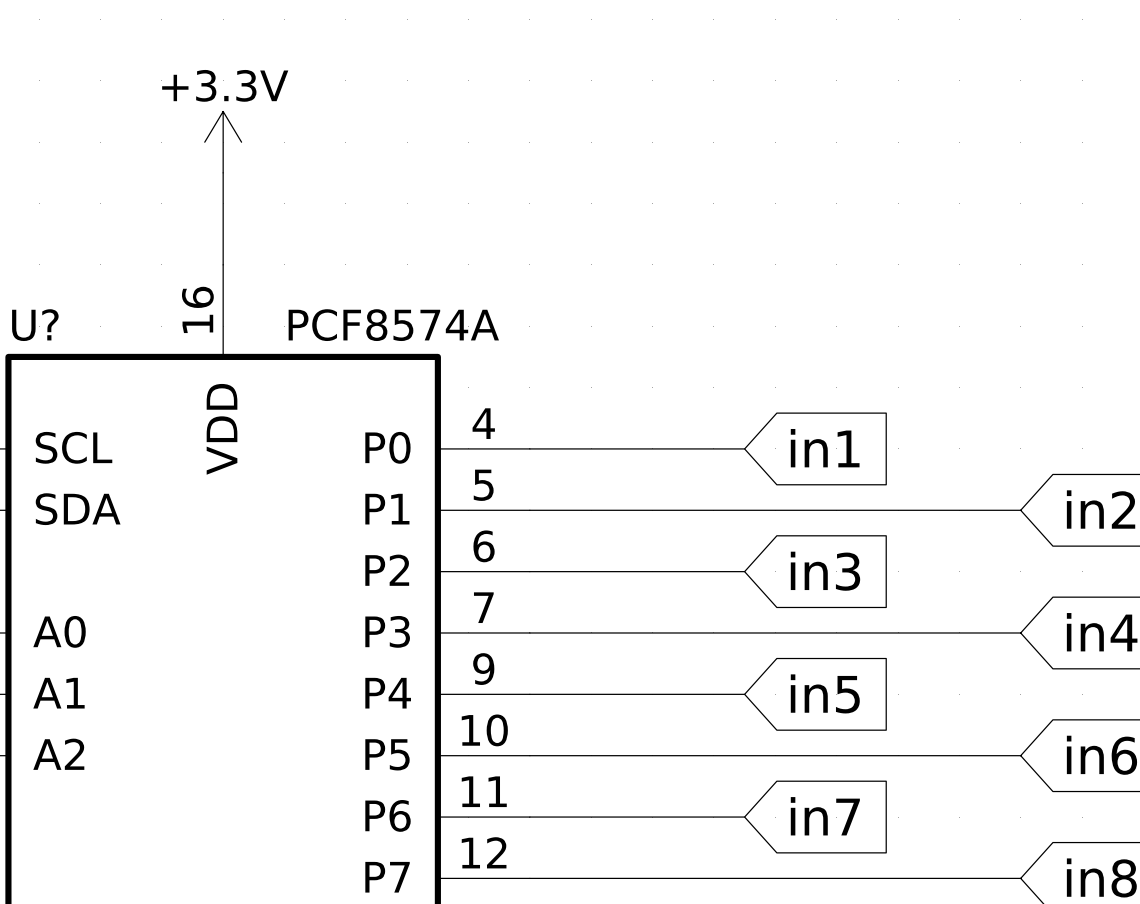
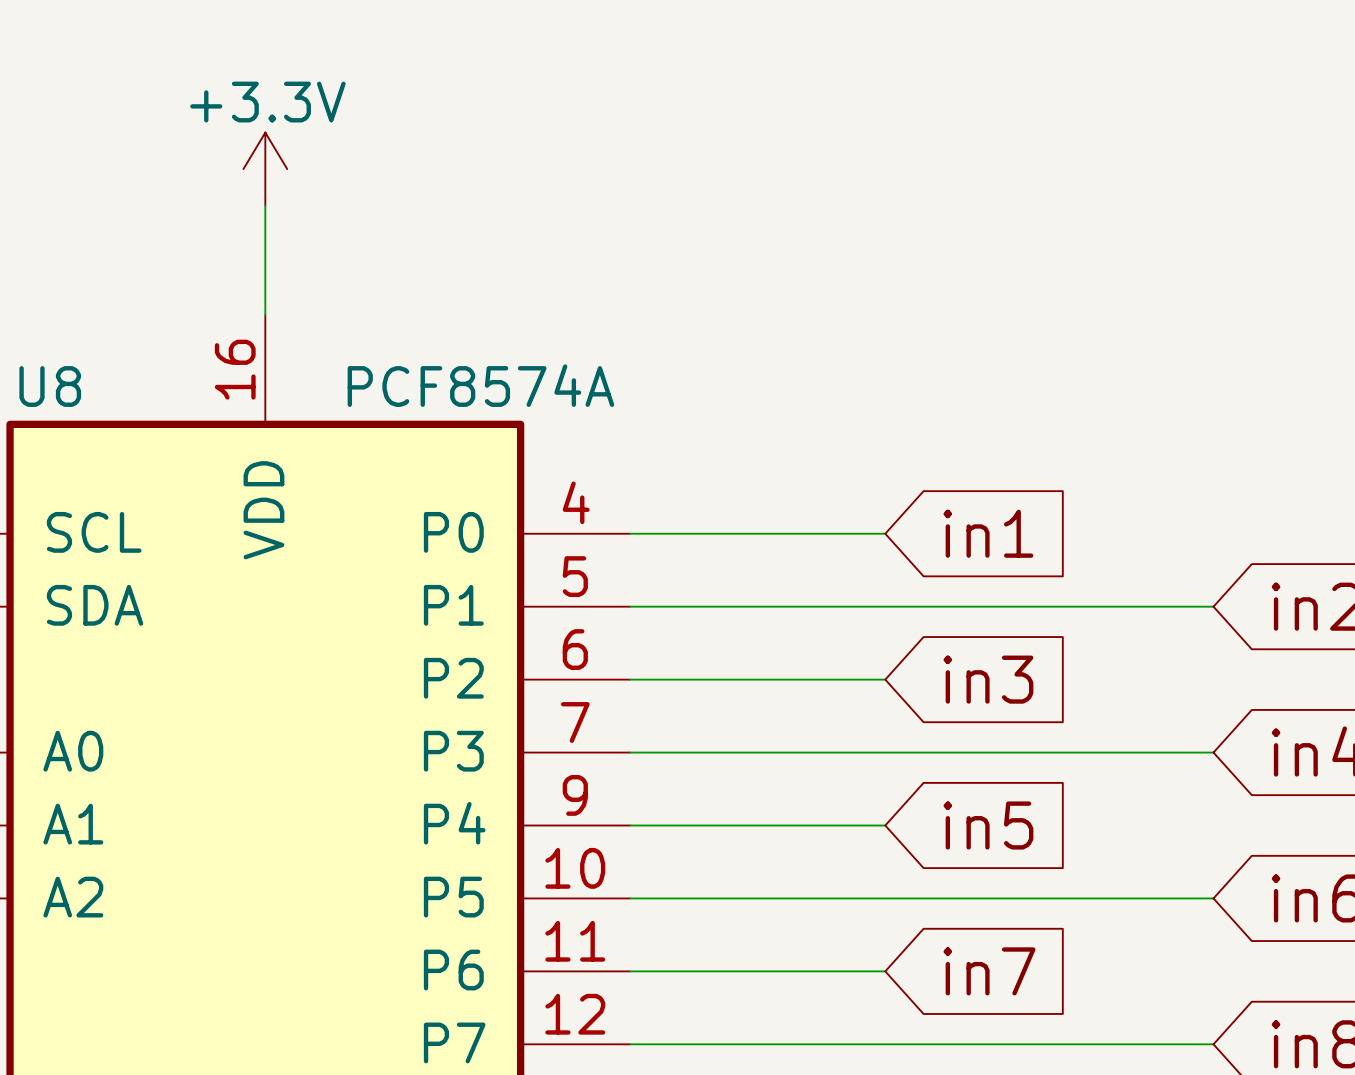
U? name: U? (35, 325) -> U8 (50, 386)

